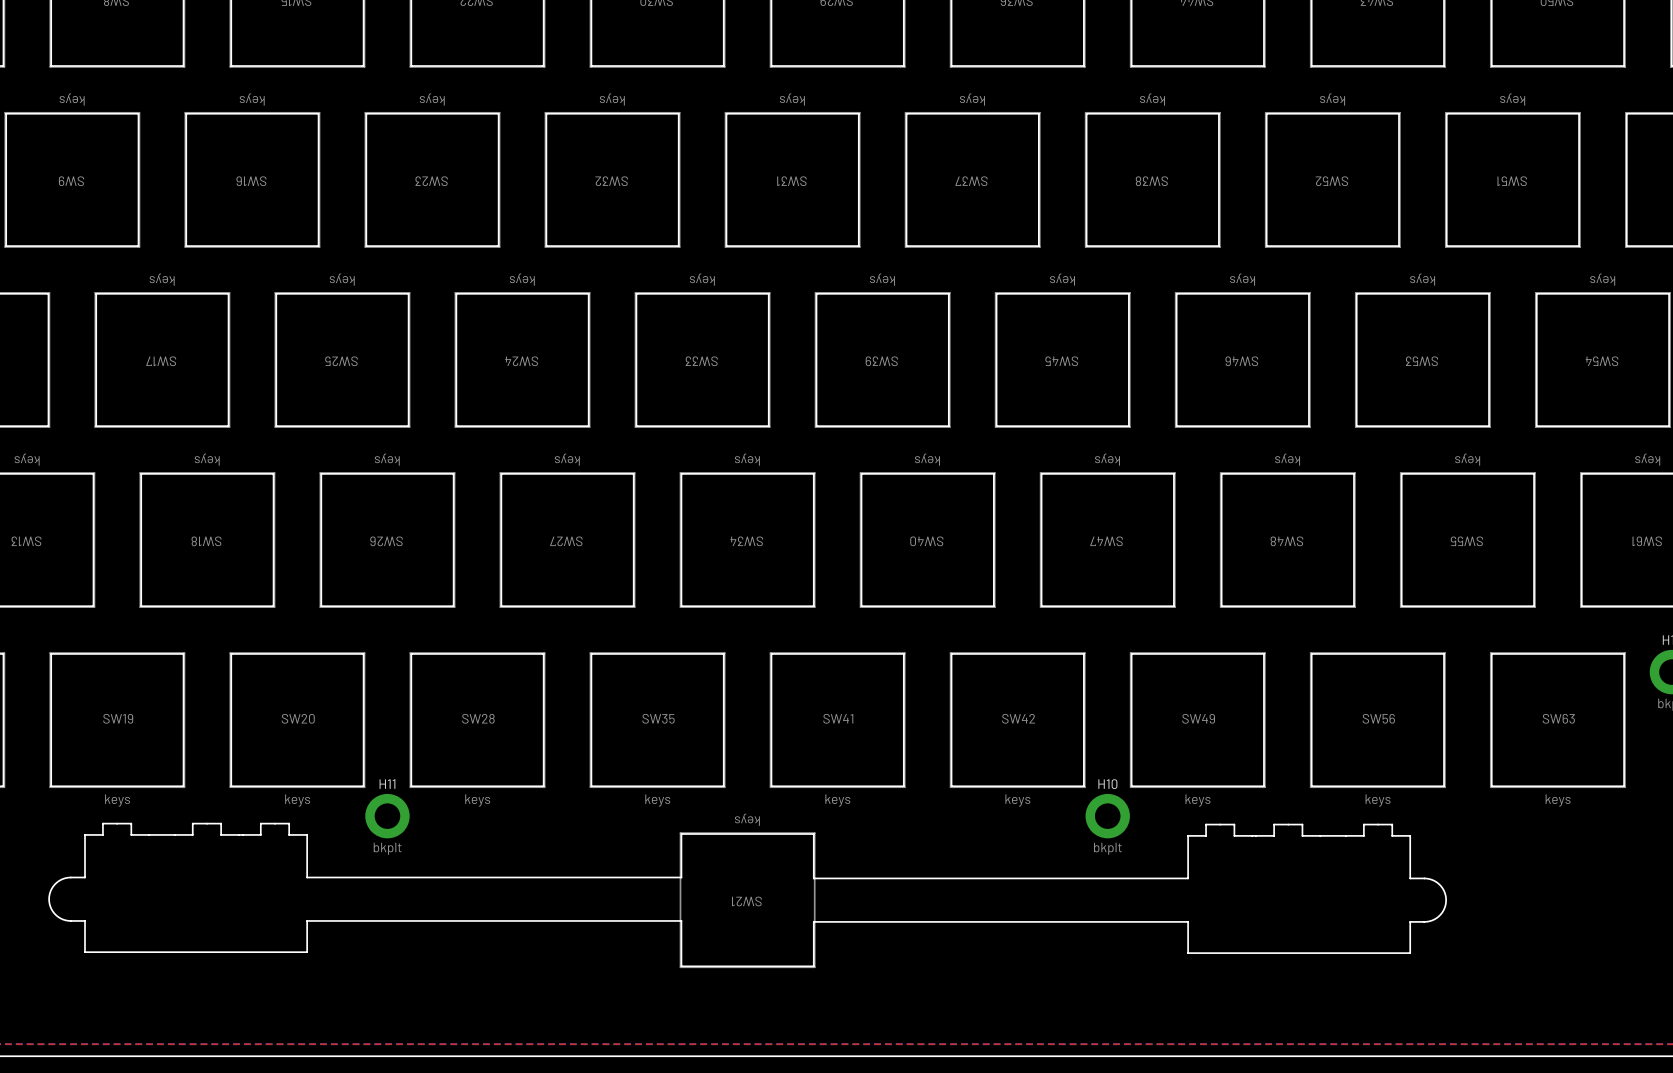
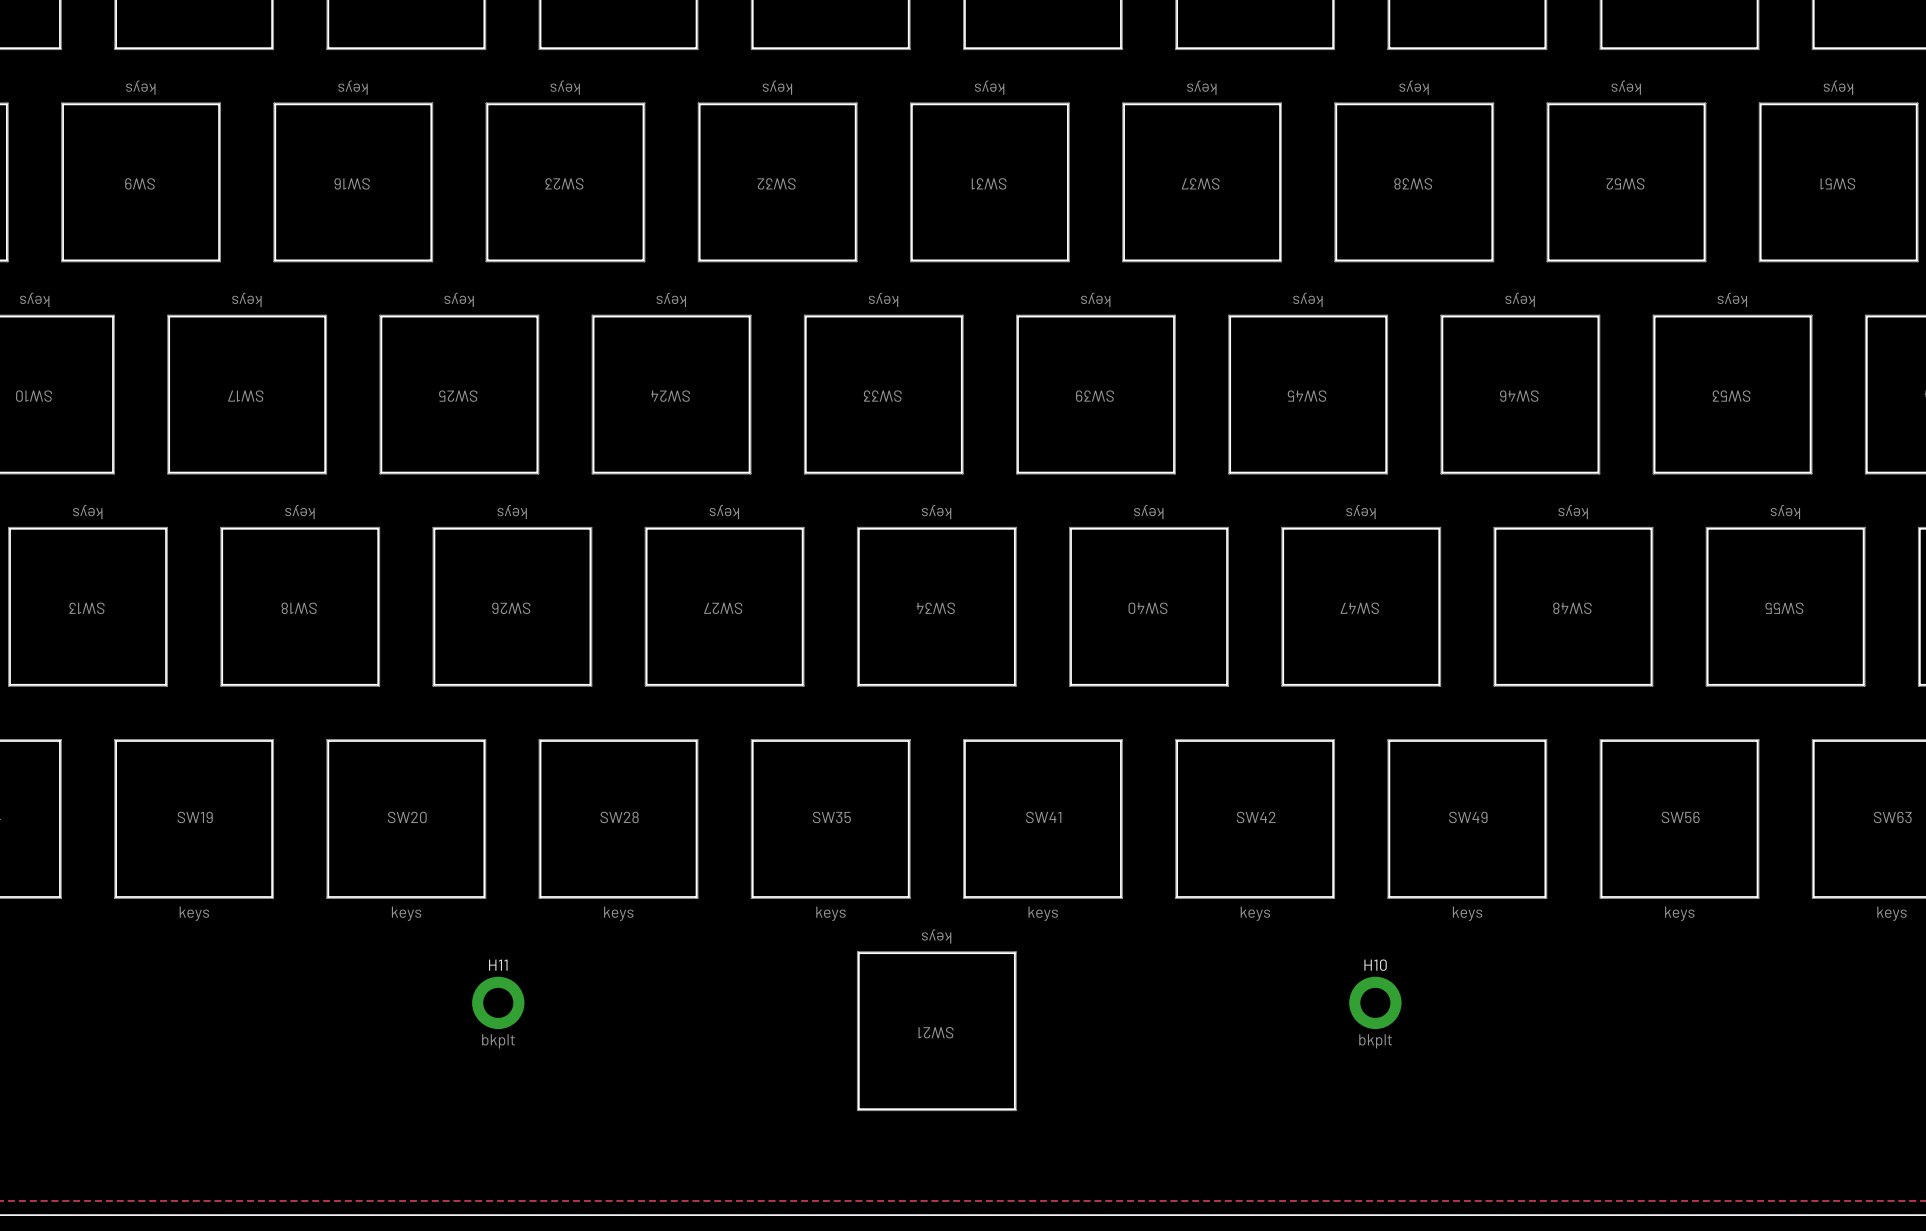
H11 position: (387, 816) -> (498, 1002)
H10 position: (1107, 816) -> (1375, 1002)
SW21 footprint: [48, 823, 1447, 968] -> [857, 951, 1017, 1111]

